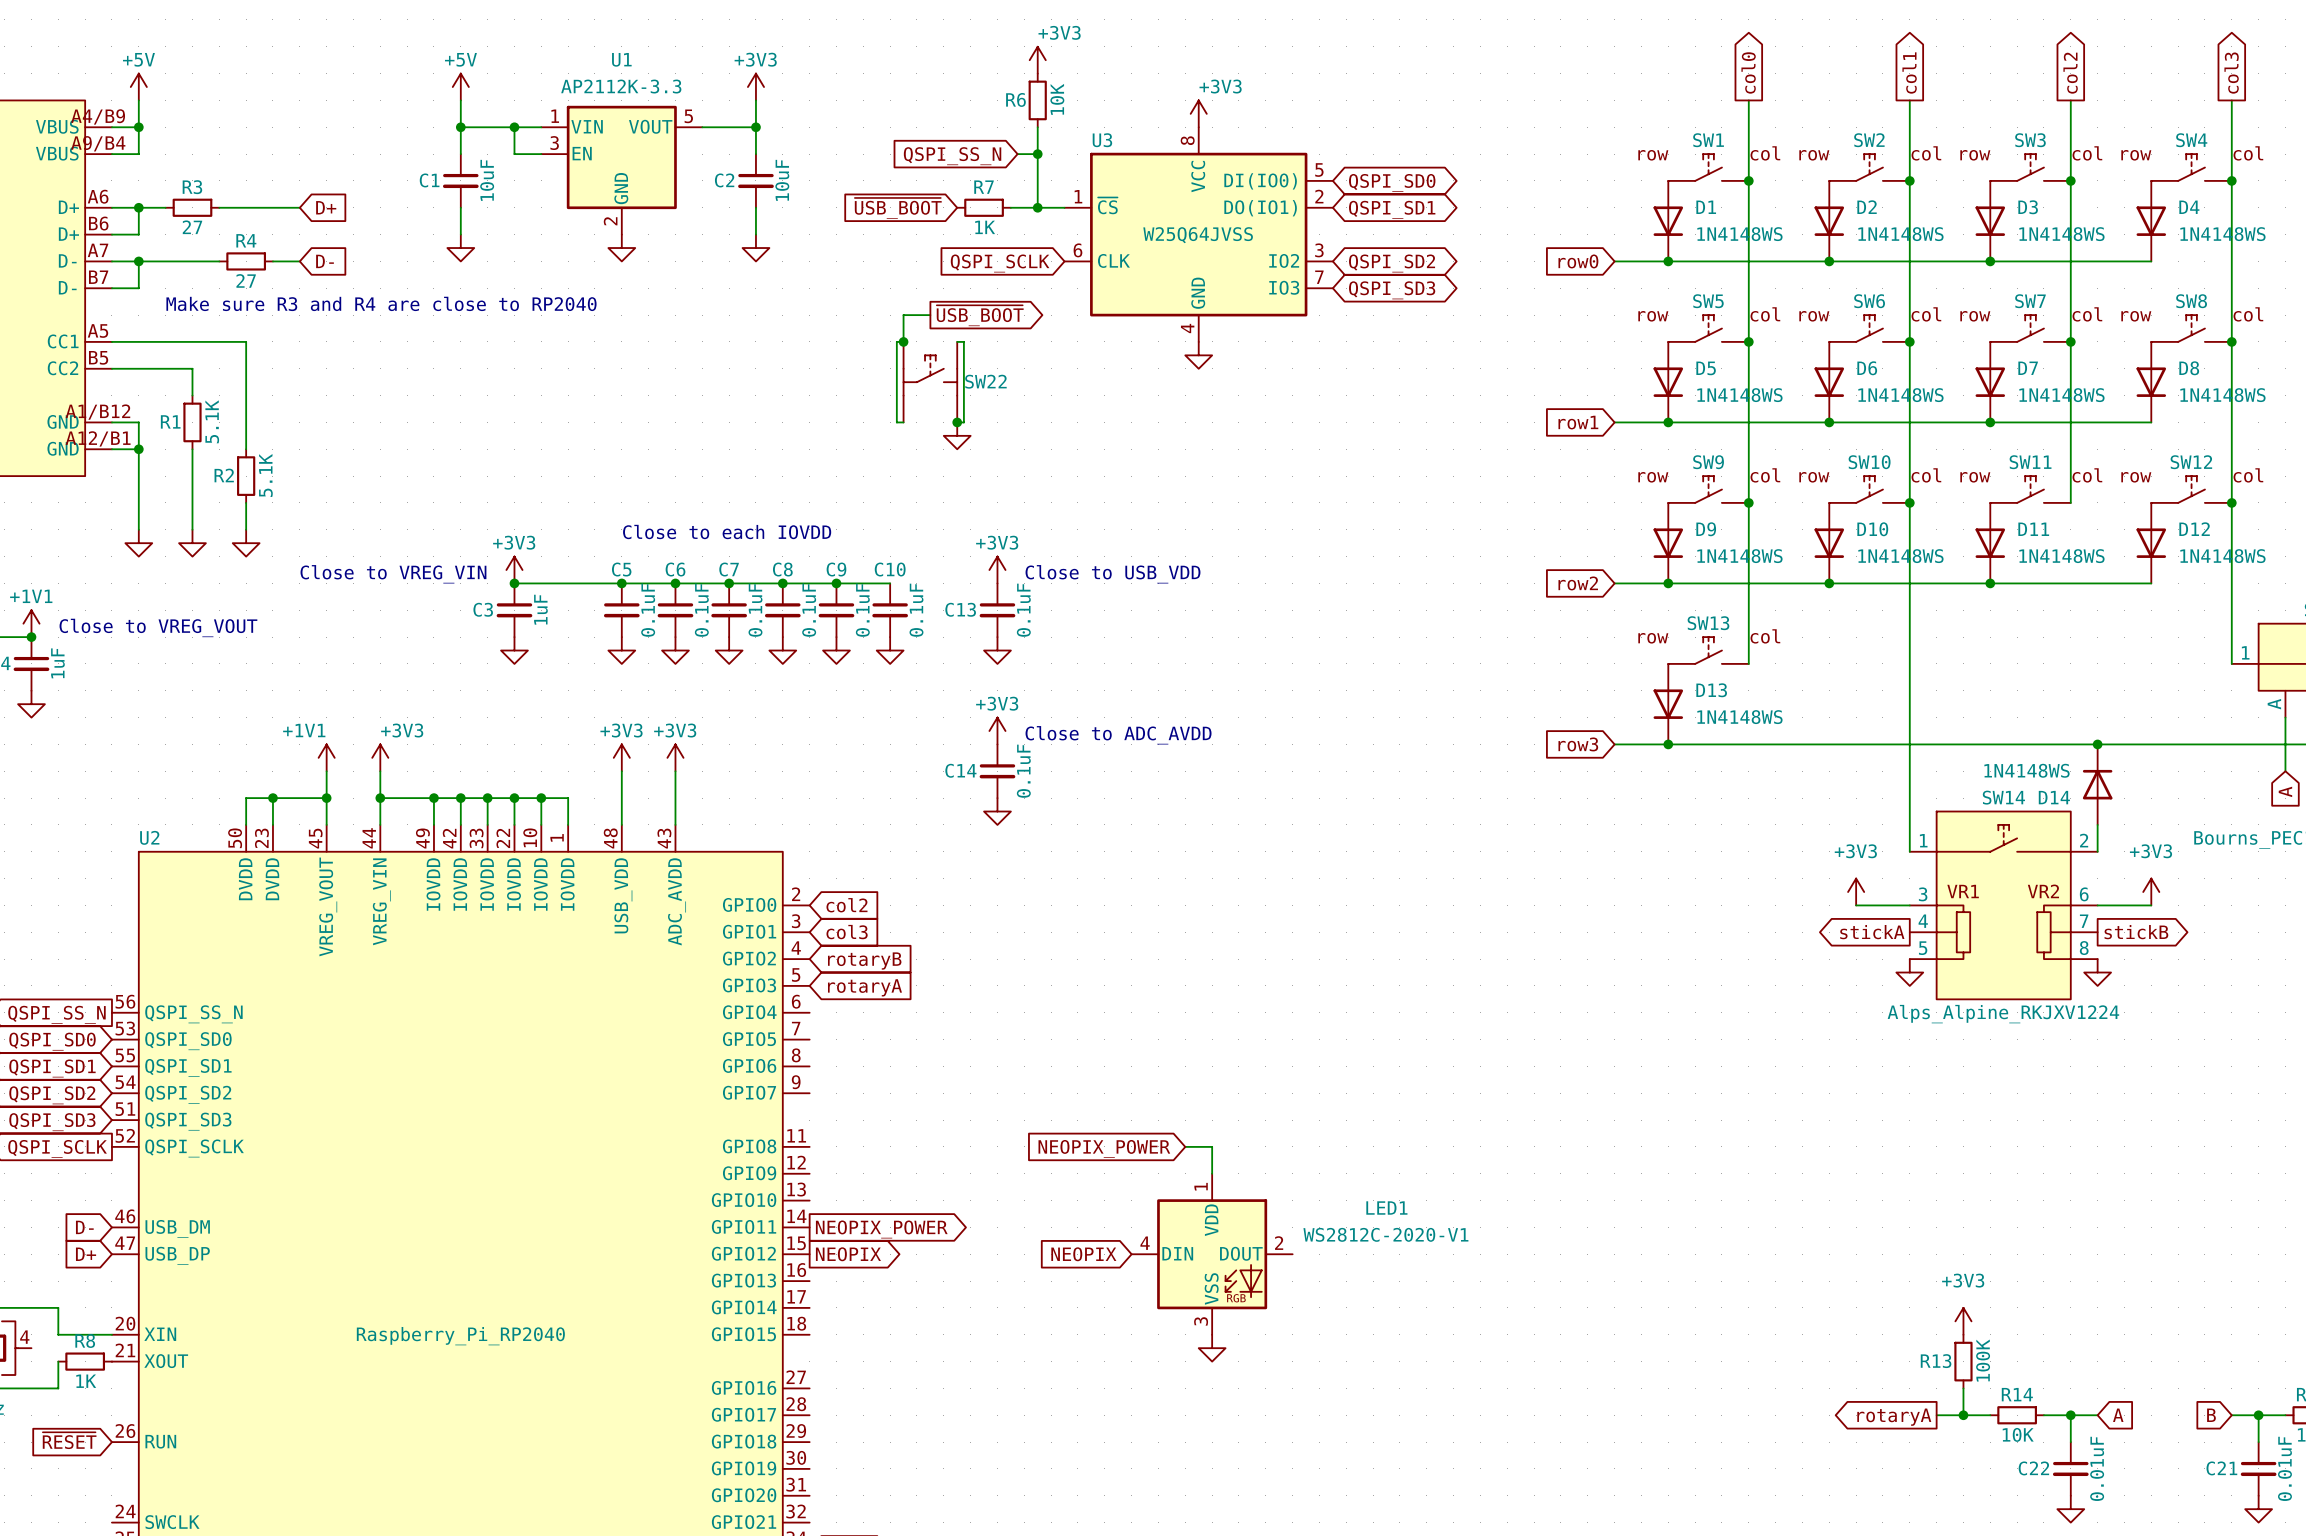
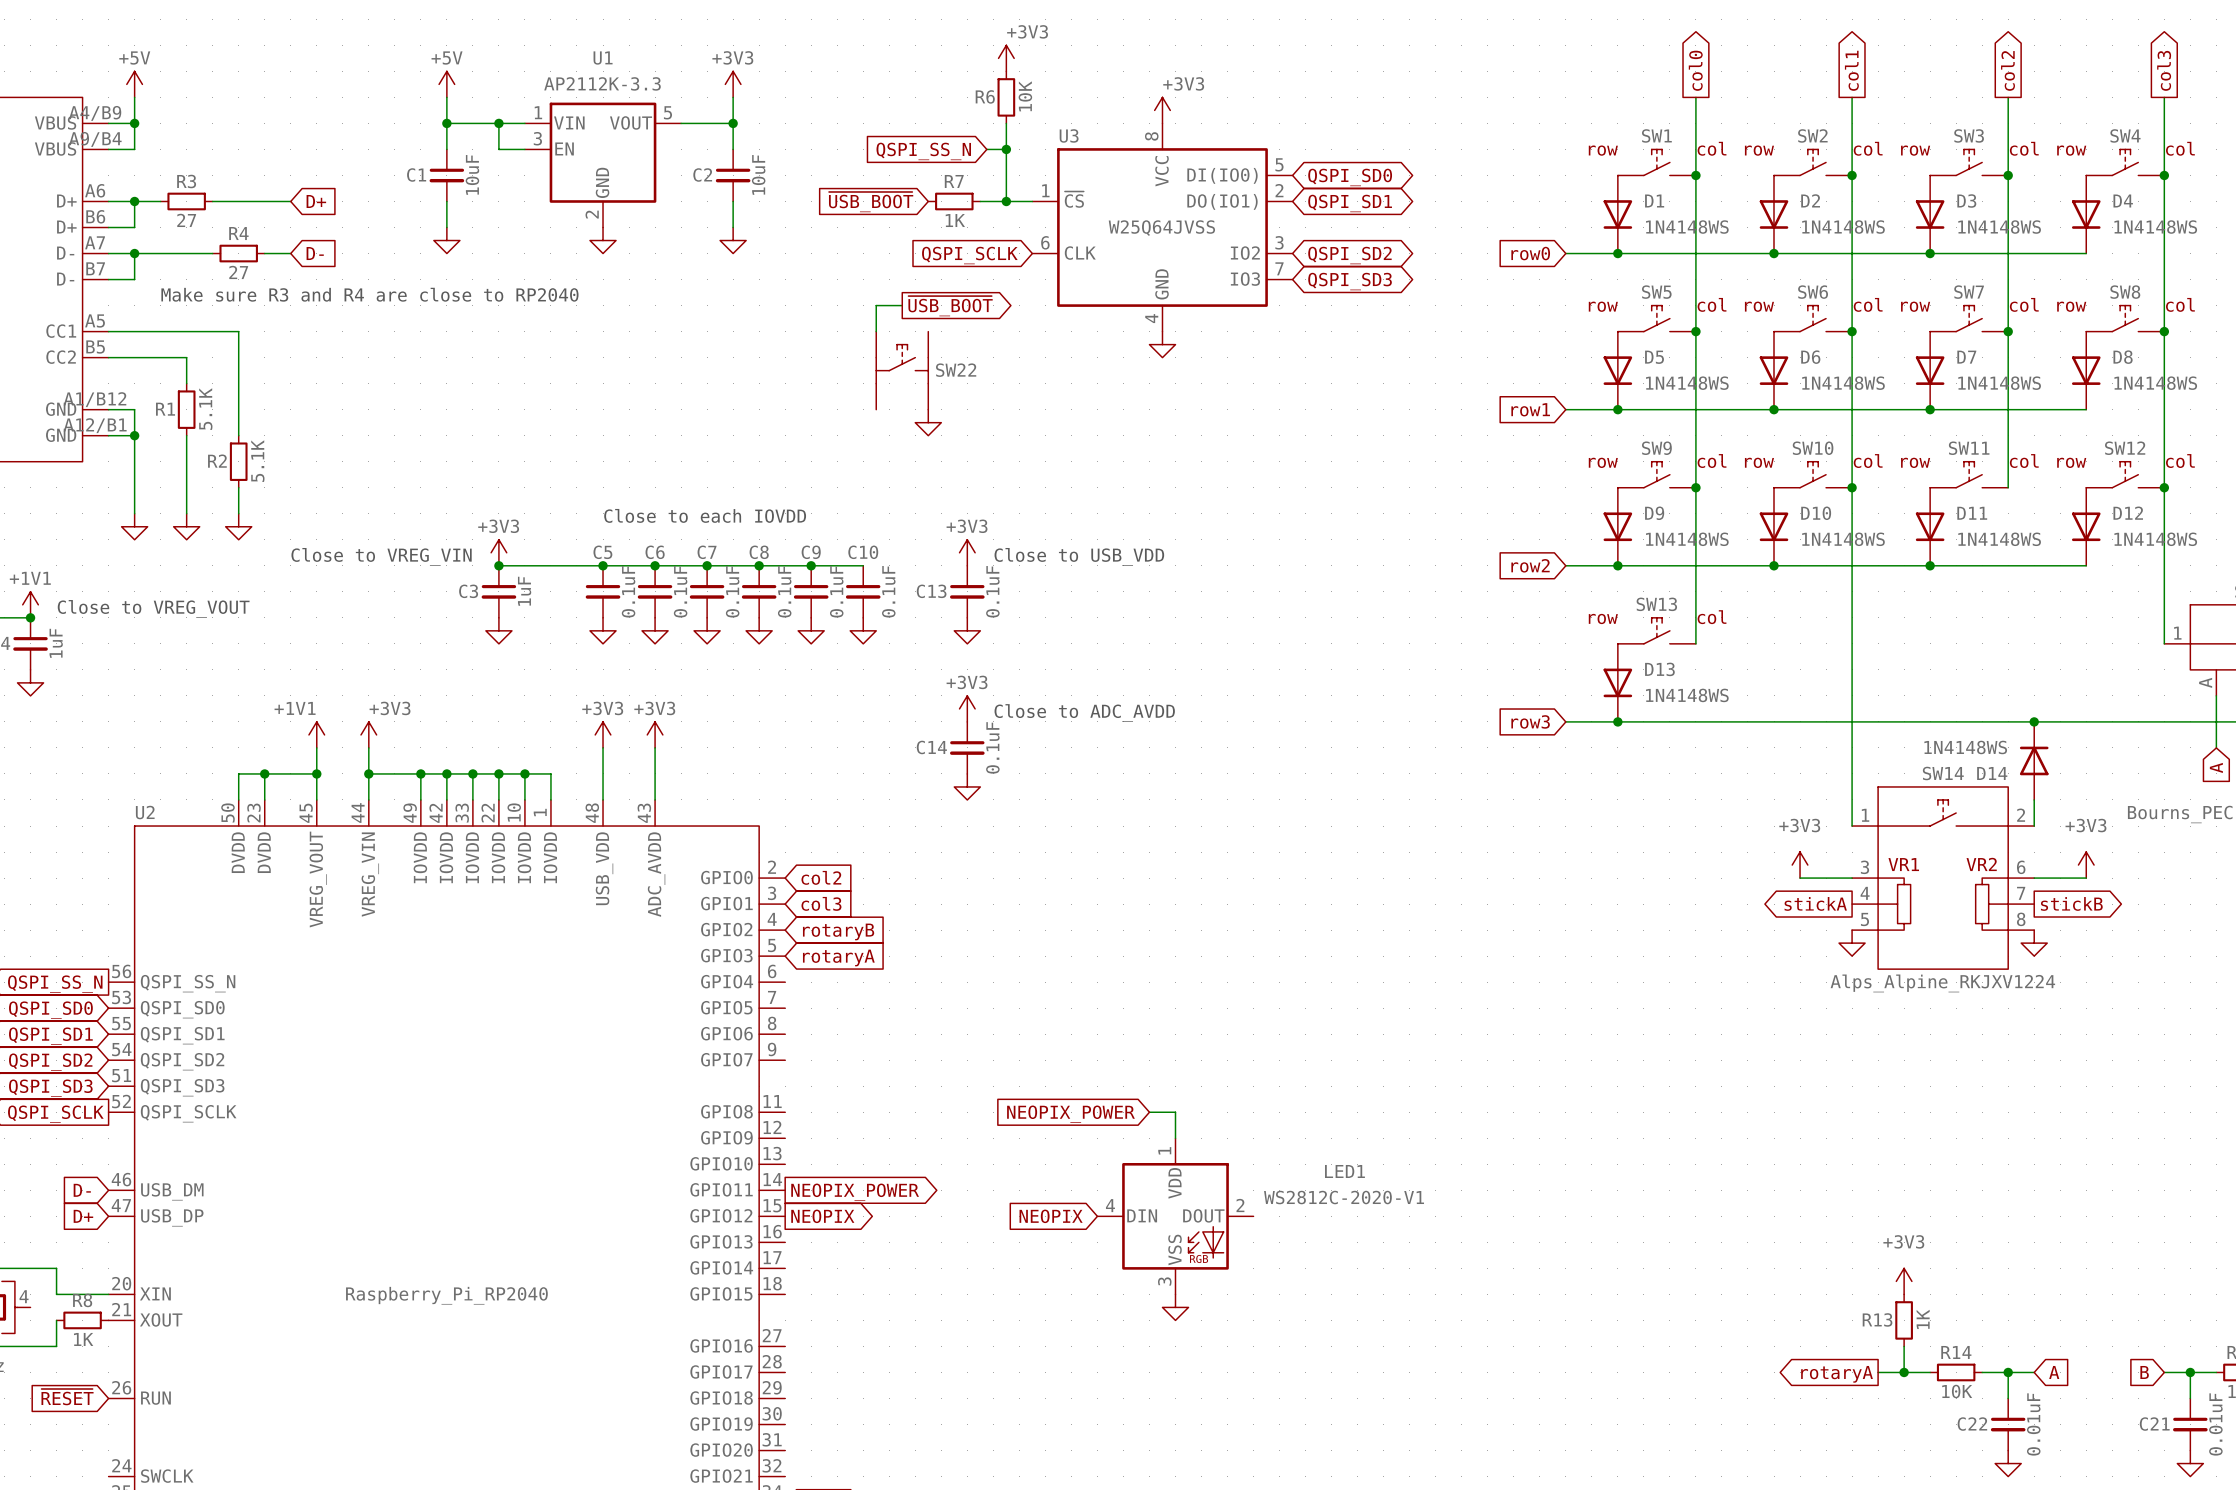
wire: (903, 341) (896, 341) (896, 422) (903, 422) -> none
junction: (903, 341) -> none
wire: (957, 341) (963, 341) (963, 422) (957, 422) -> none
junction: (957, 422) -> none
R13 value: 100K (1983, 1360) -> 1K (1923, 1319)

